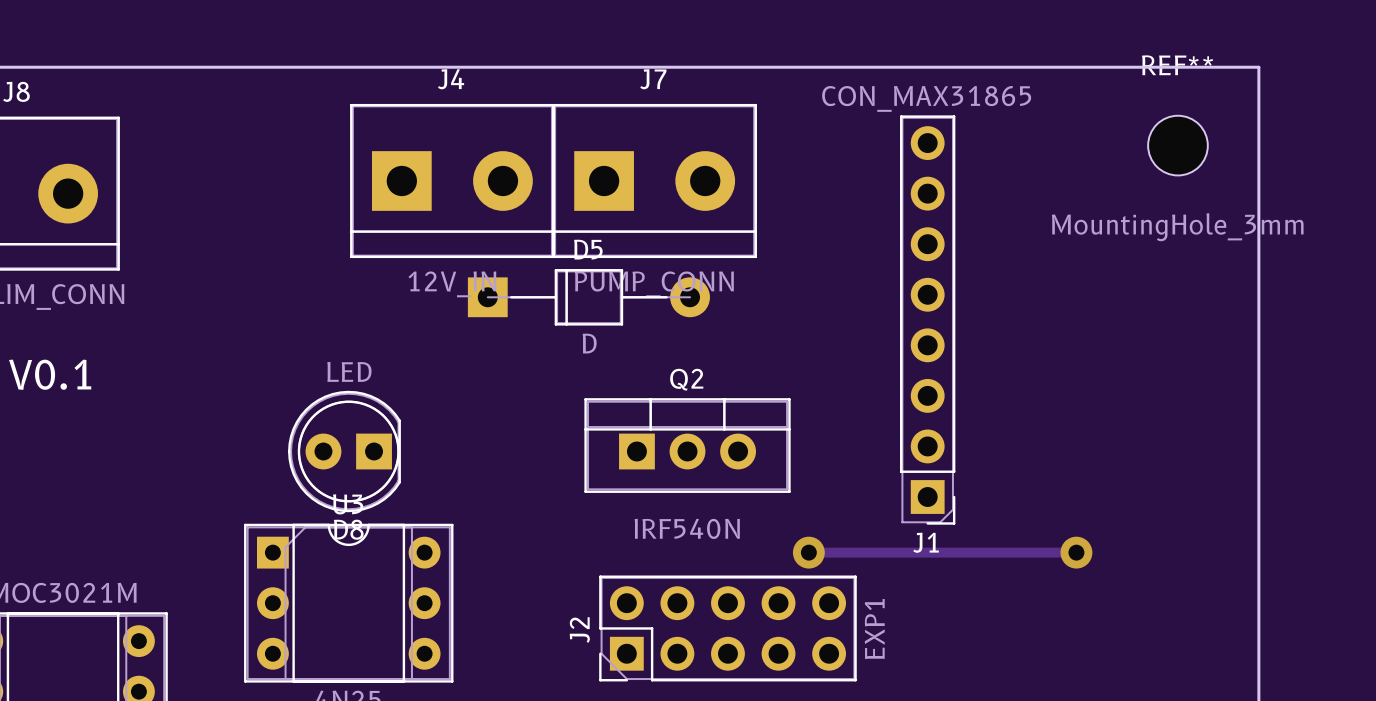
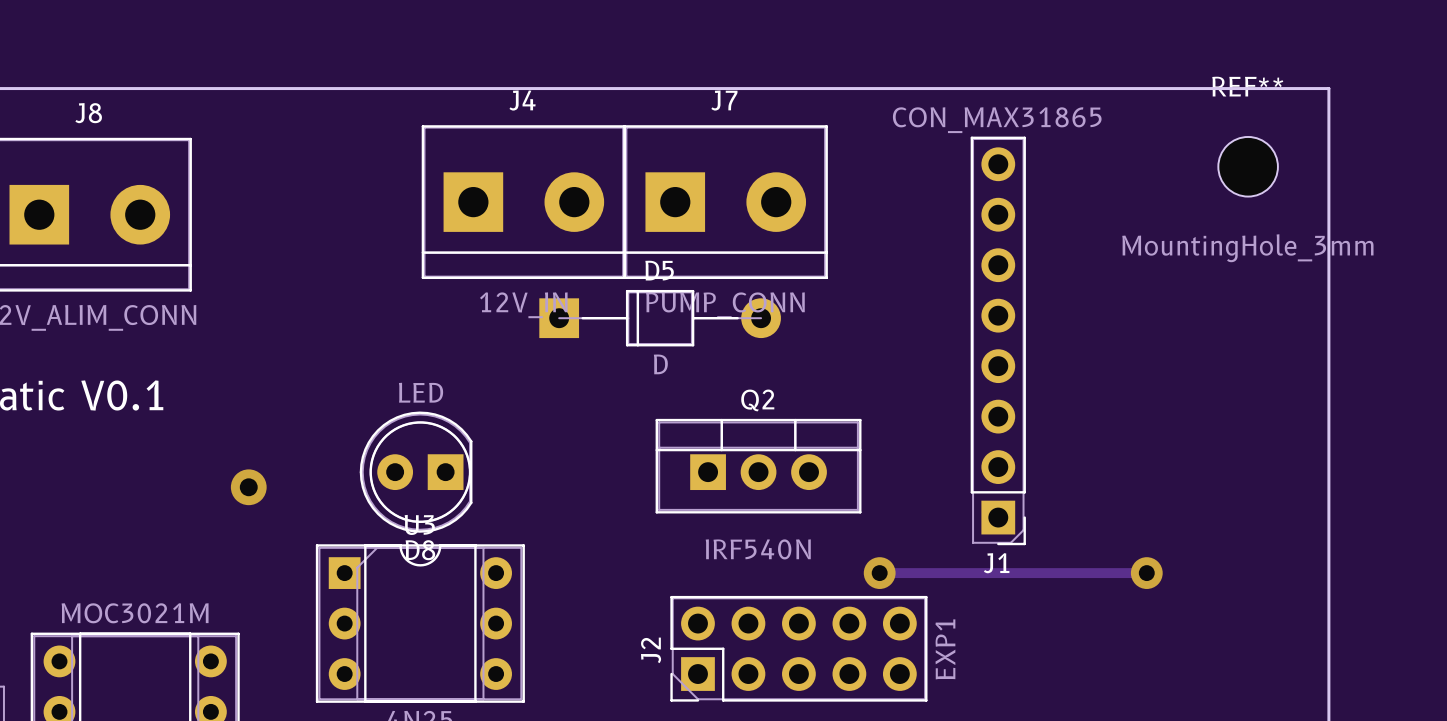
via: none -> (248, 487)

